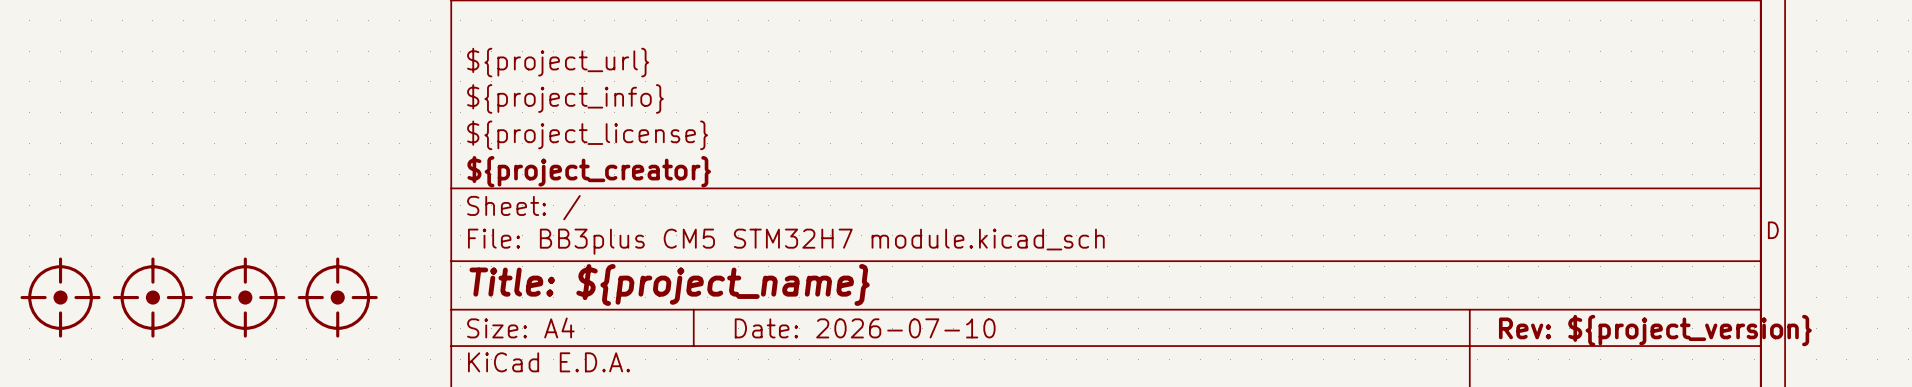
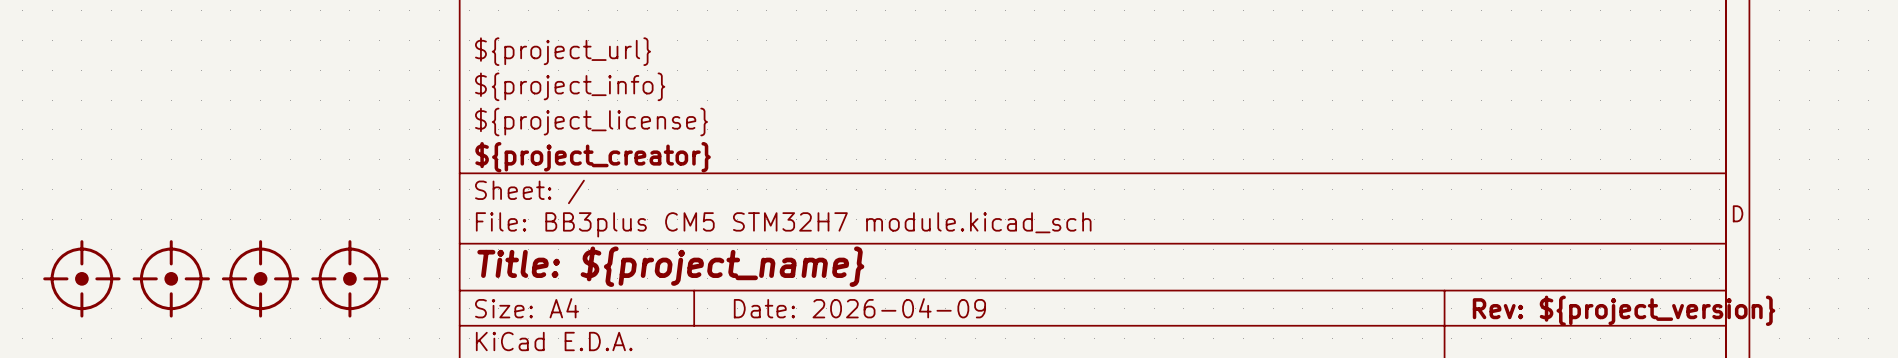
title block: Date: 2026-07-10 (865, 328) -> Date: 2026-04-09 (859, 308)

